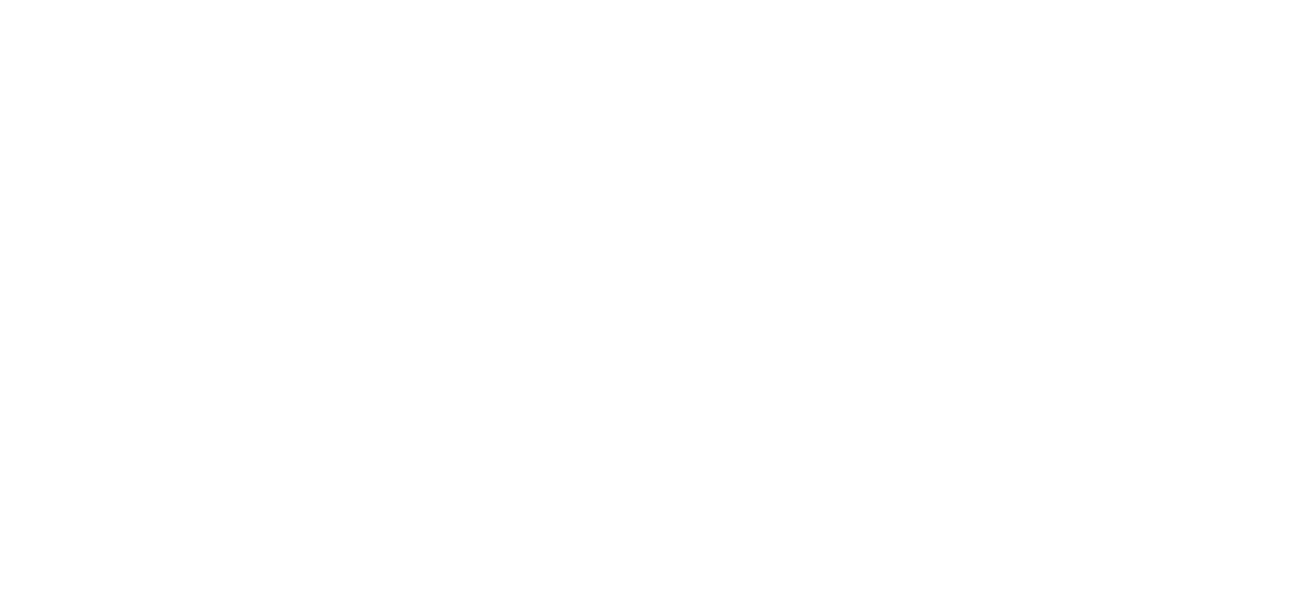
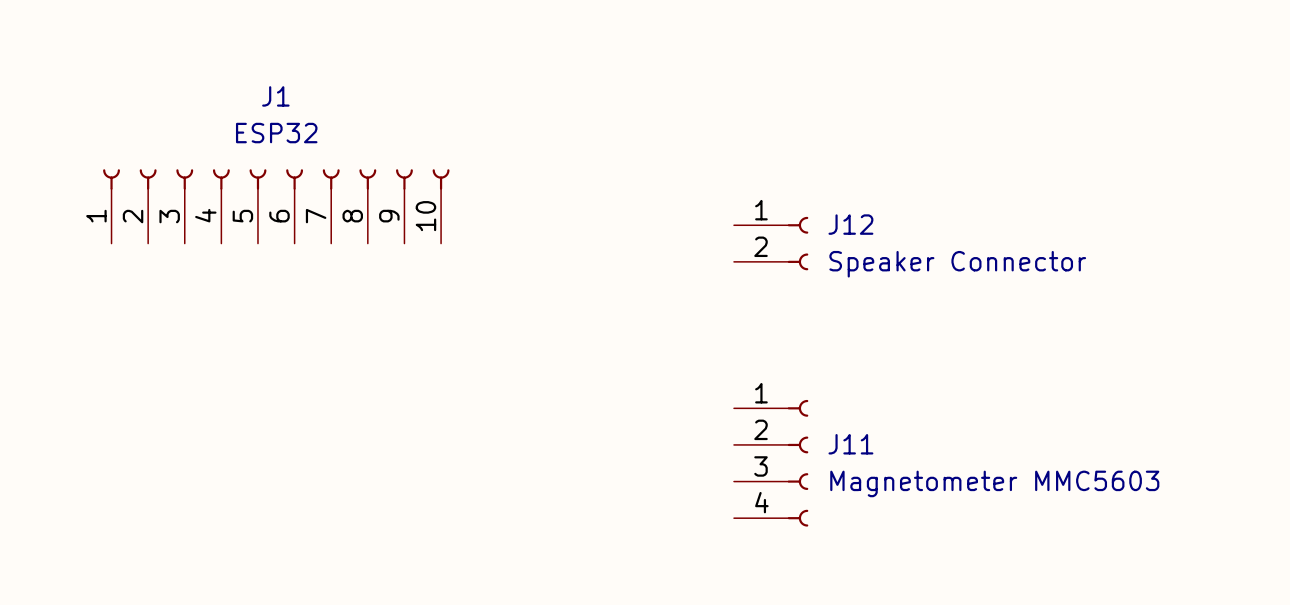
J1: none -> ESP32 (276, 206)
J12: none -> Speaker Connector (771, 243)
J11: none -> Magnetometer MMC5603 (771, 463)

